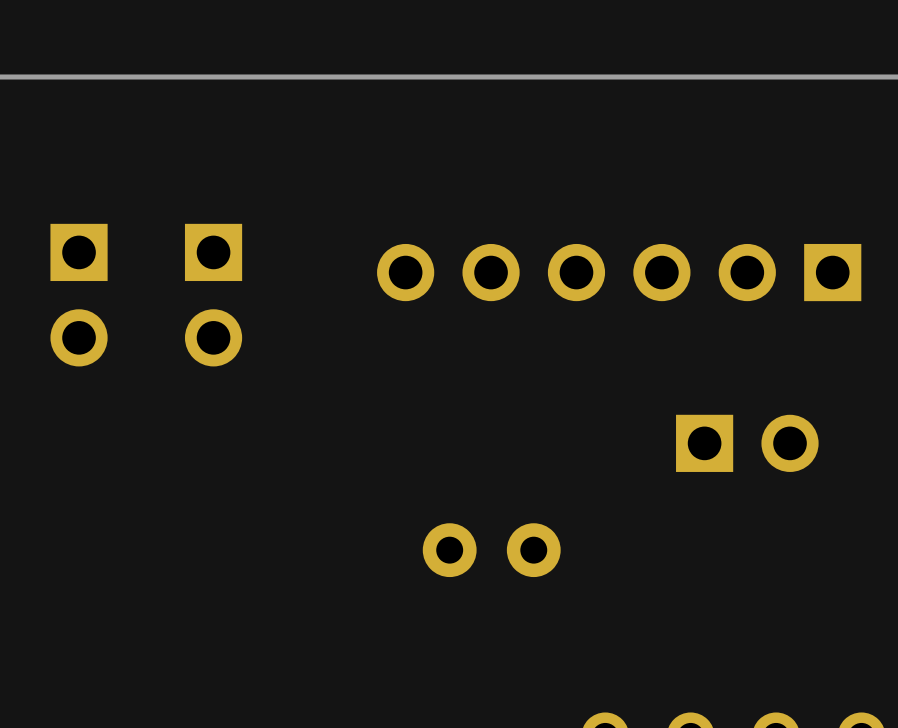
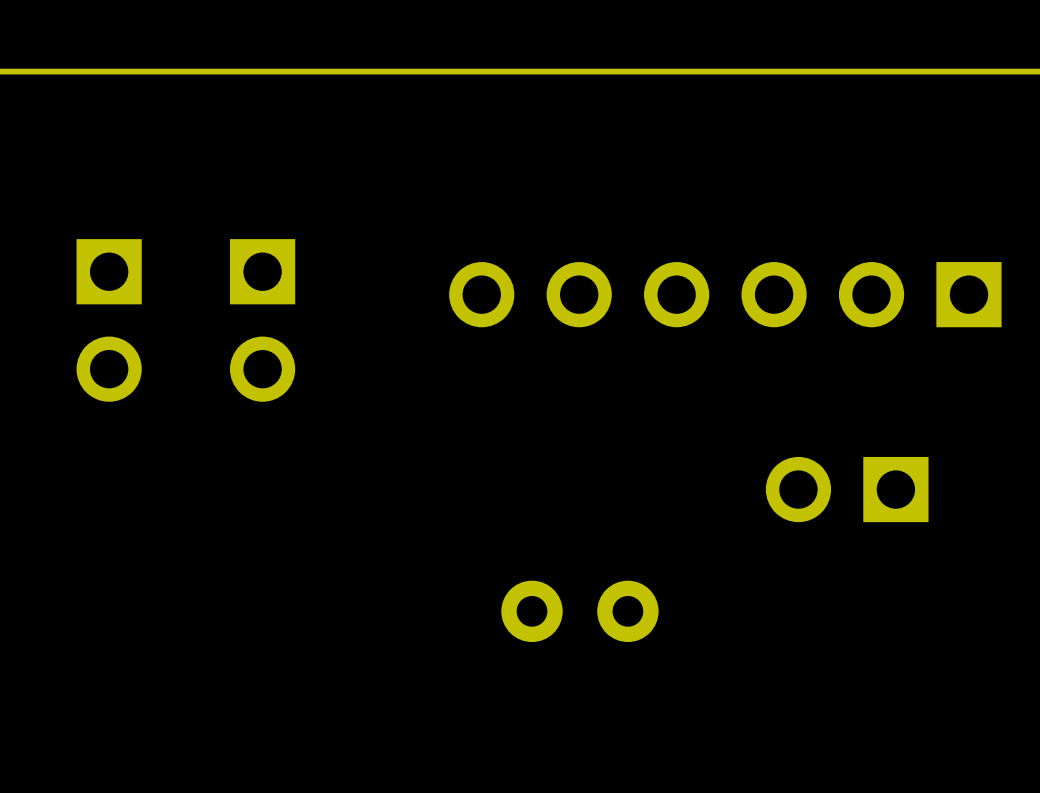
part rotation: 0° (747, 443) -> 180° (847, 489)

